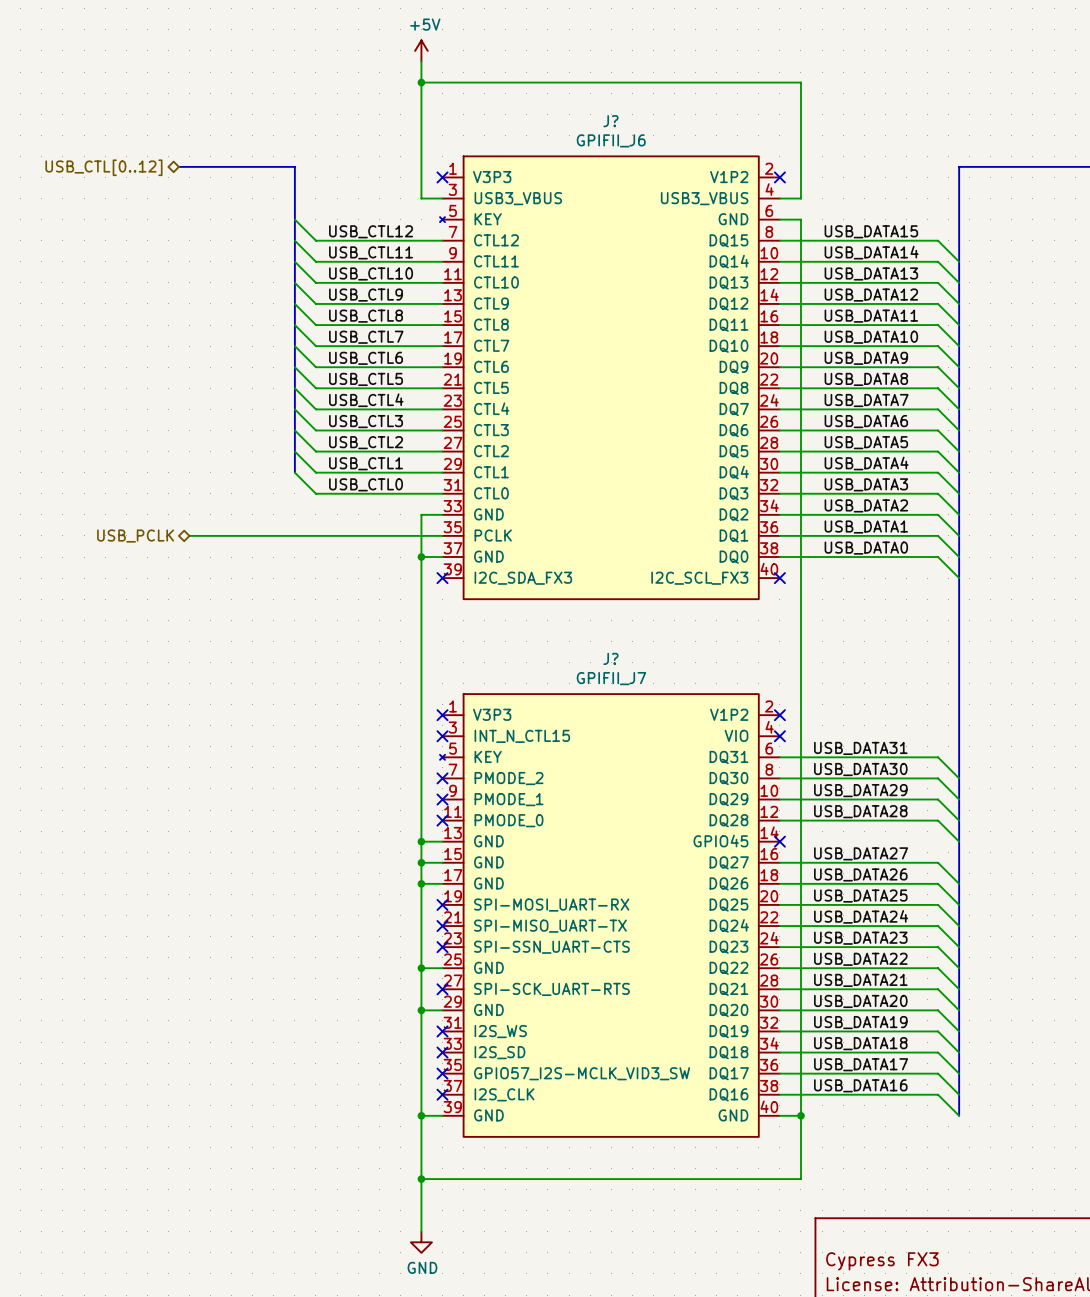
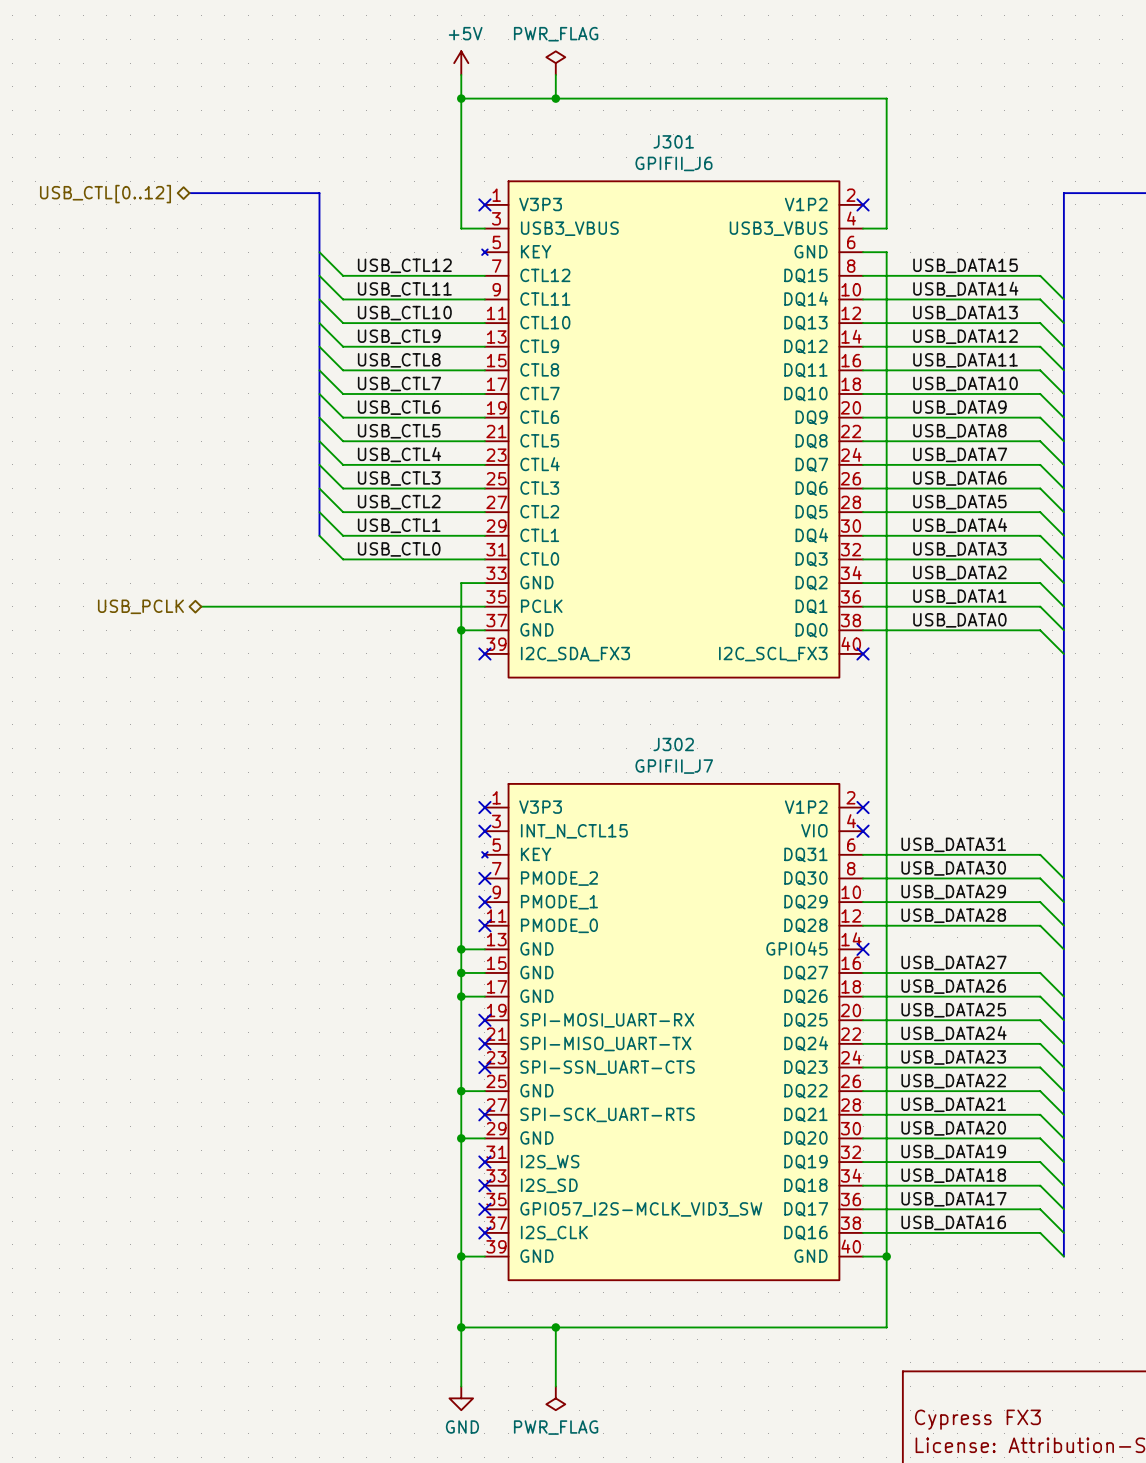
power symbol: none -> PWR_FLAG (555, 63)
wire: none -> (555, 74) (555, 98)
junction: none -> (555, 98)
J? name: J? (610, 121) -> J301 (673, 141)
J? name: J? (610, 658) -> J302 (673, 744)
wire: none -> (555, 1327) (555, 1386)
junction: none -> (555, 1327)
power symbol: none -> PWR_FLAG (555, 1398)

